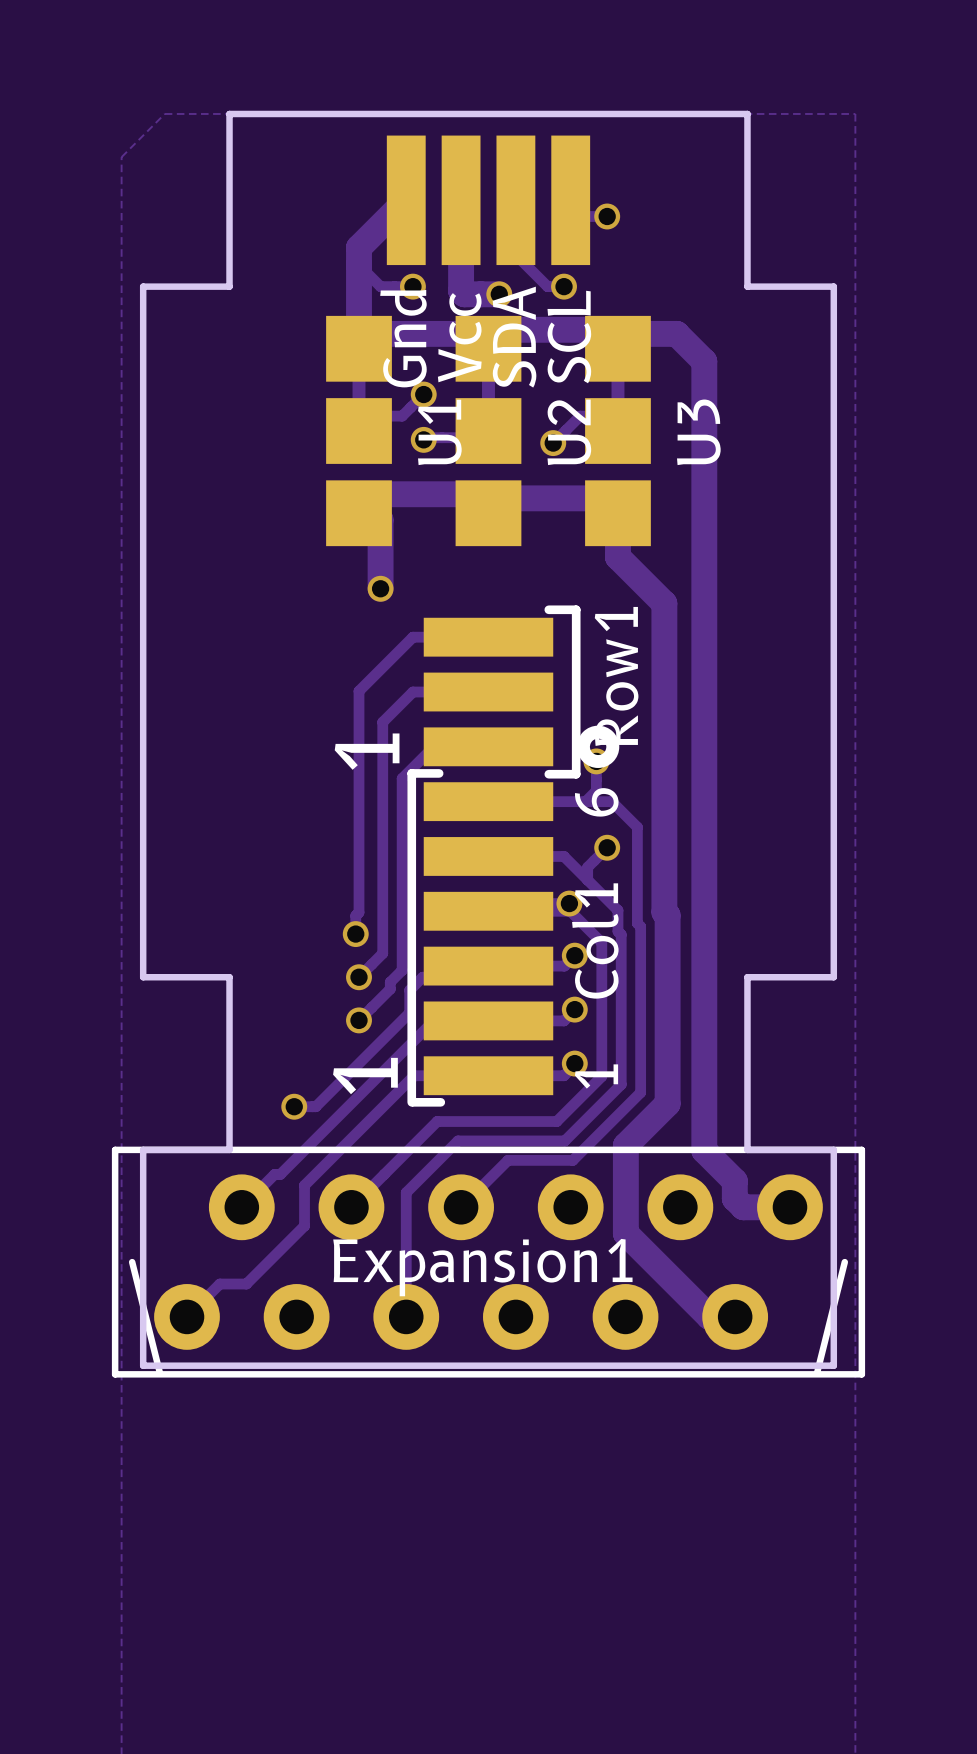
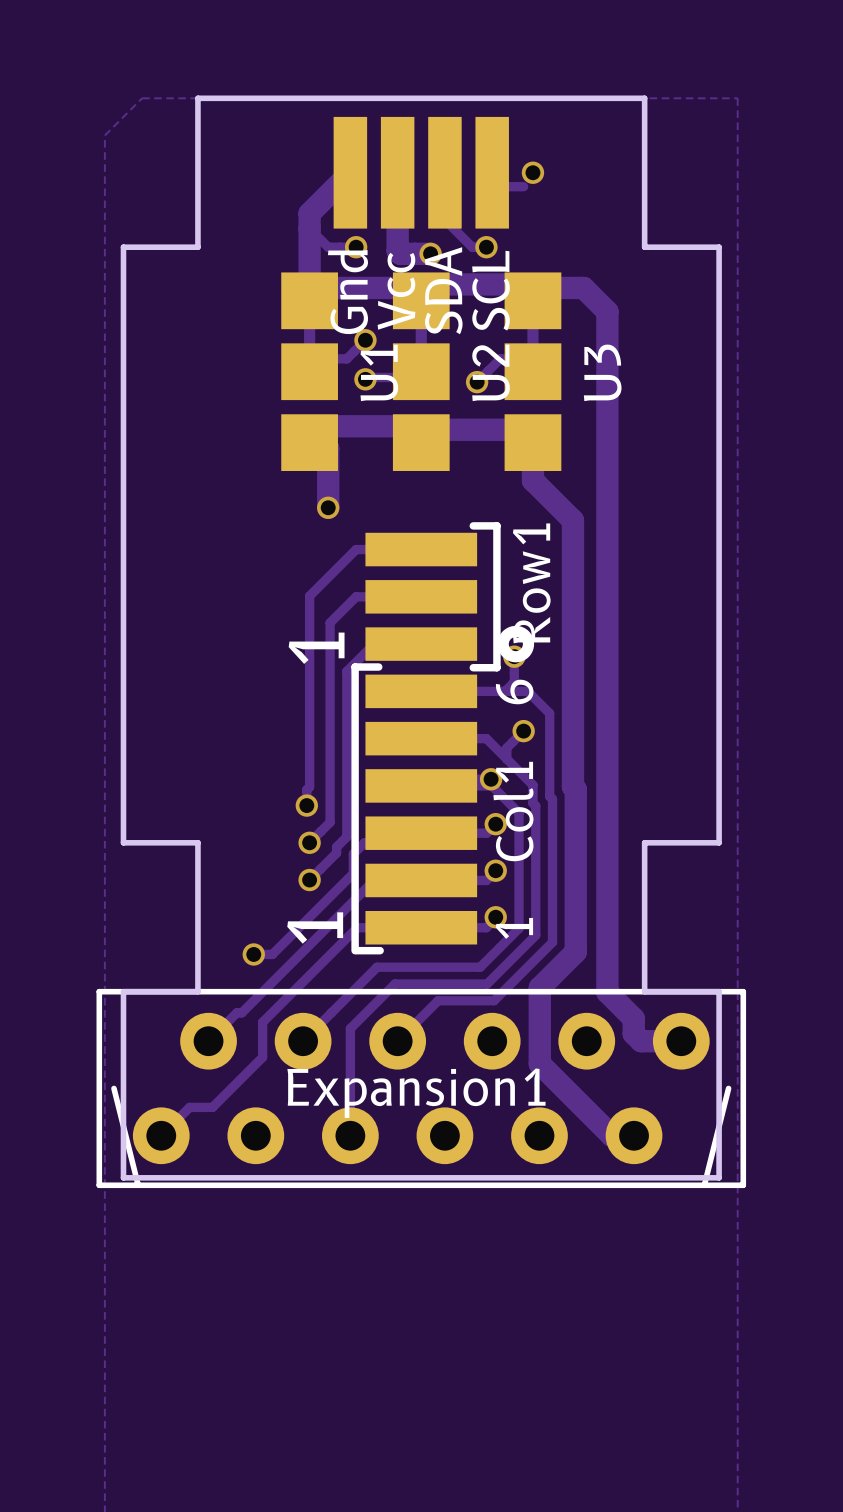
via position: (607, 216) -> (532, 172)

